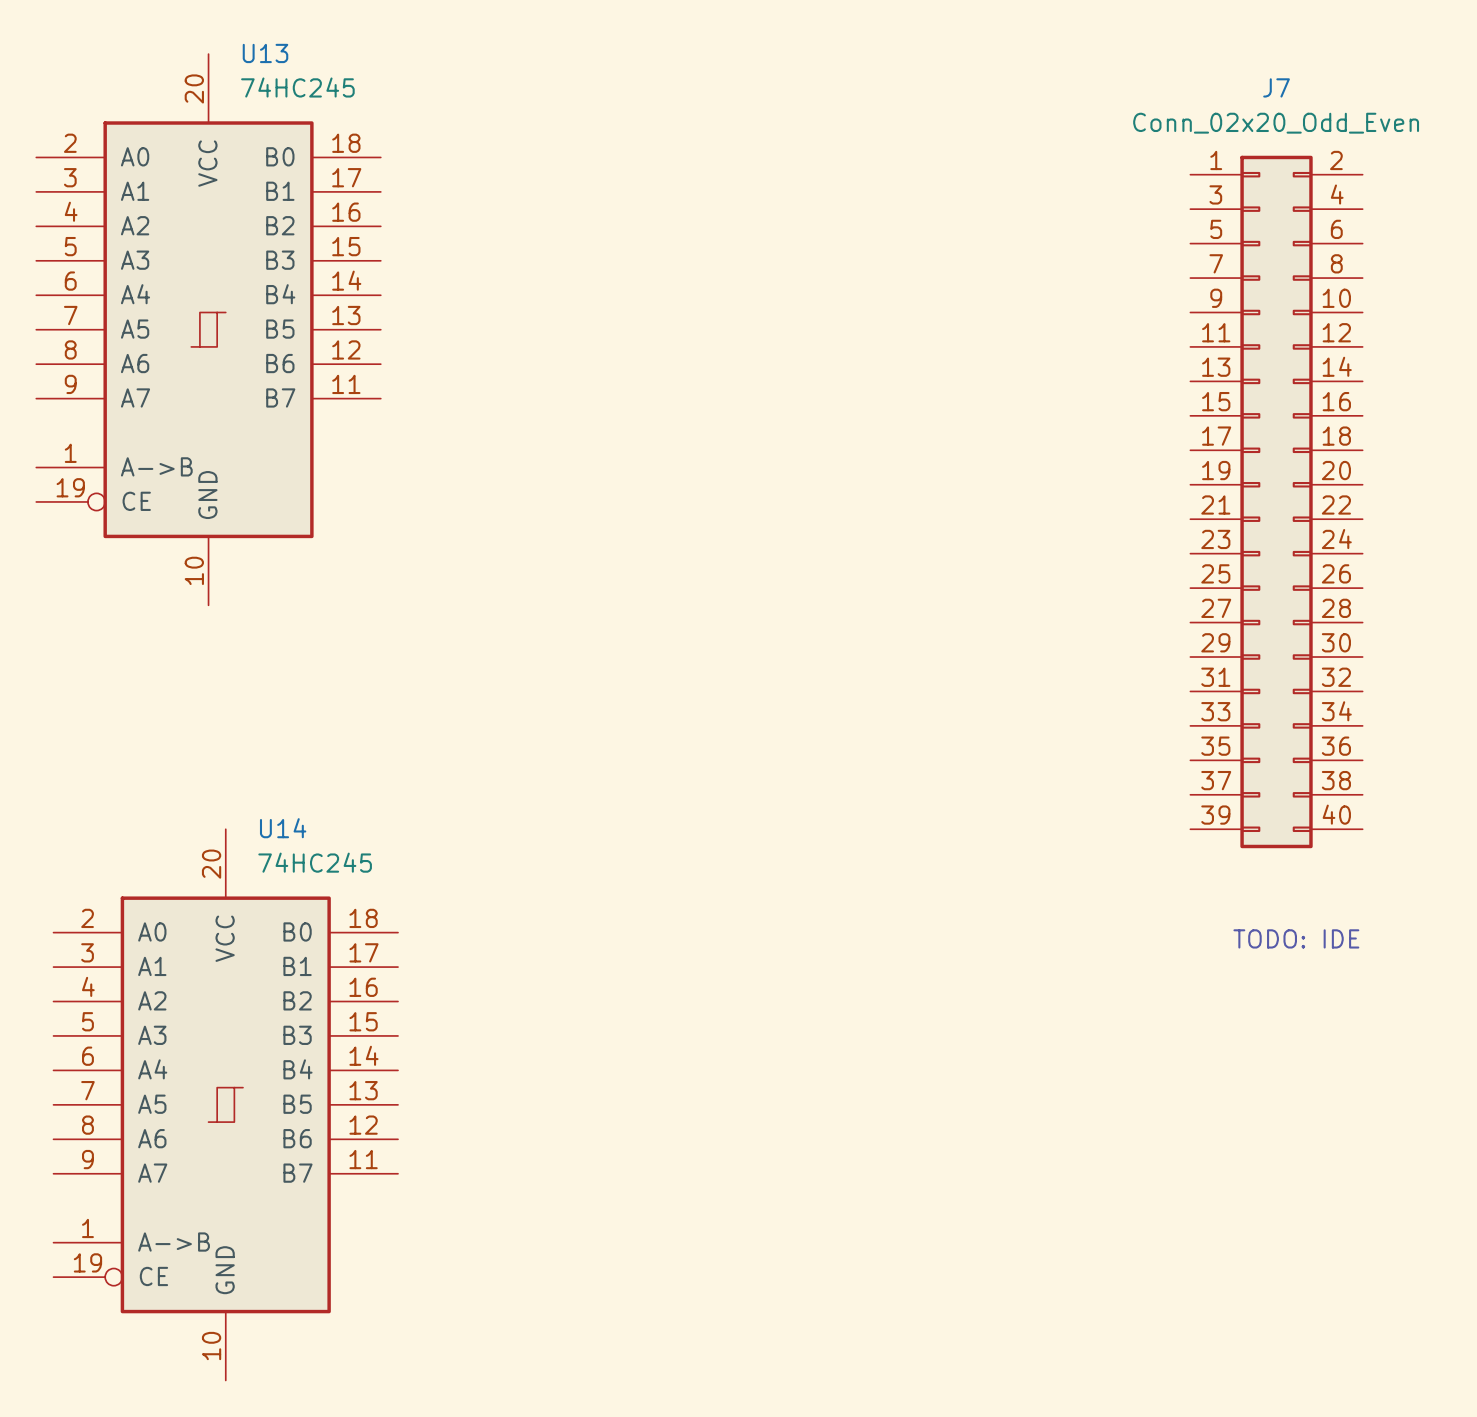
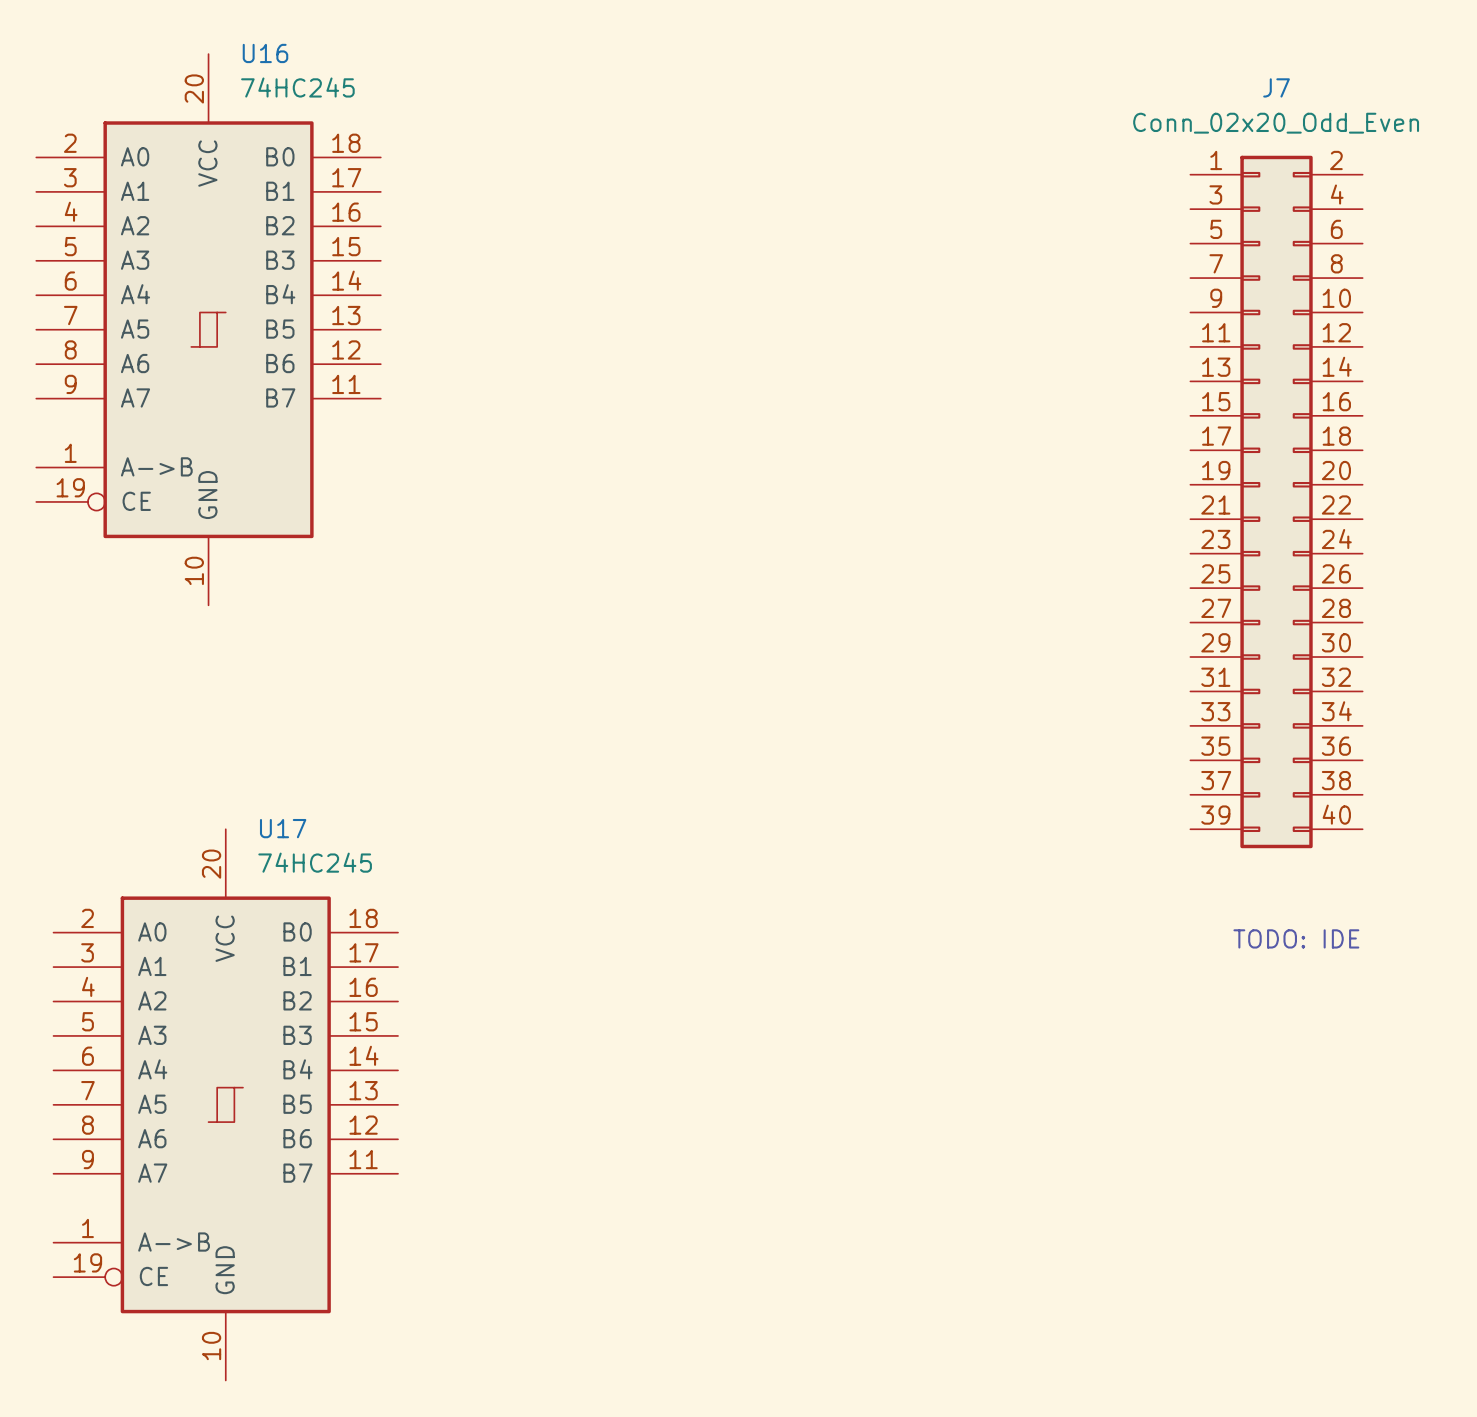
U13 name: U13 (265, 53) -> U16 (265, 53)
U14 name: U14 (283, 828) -> U17 (283, 828)

